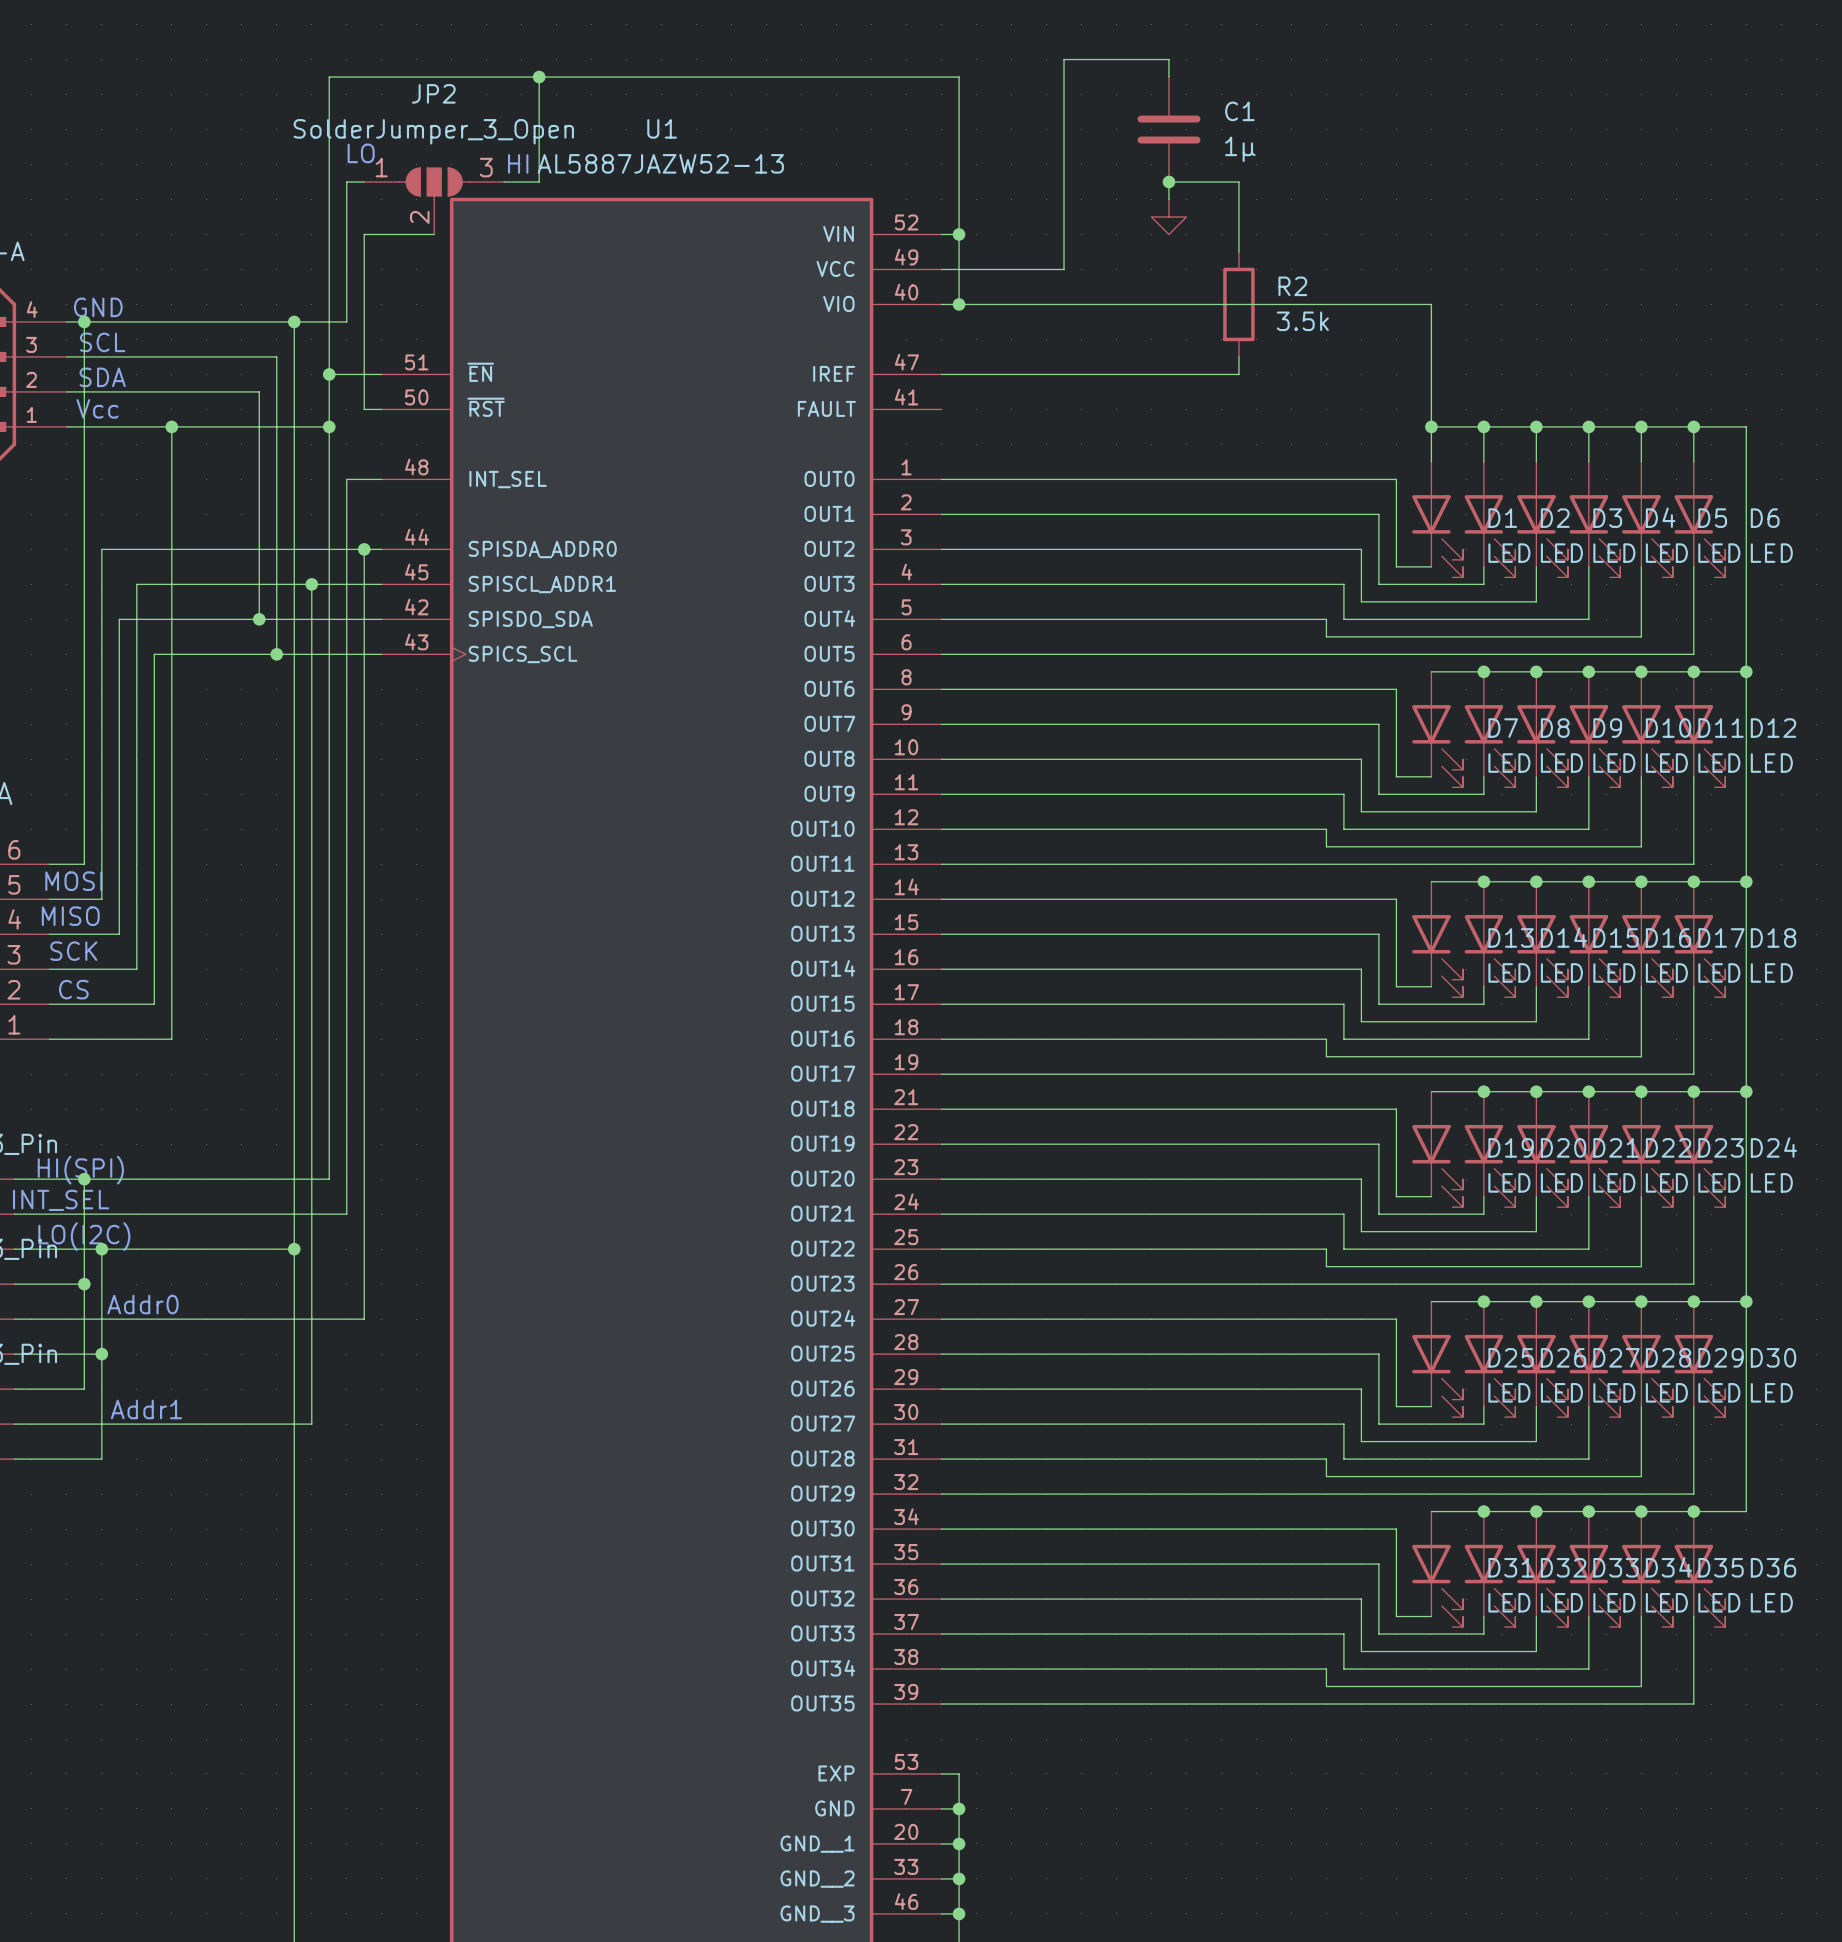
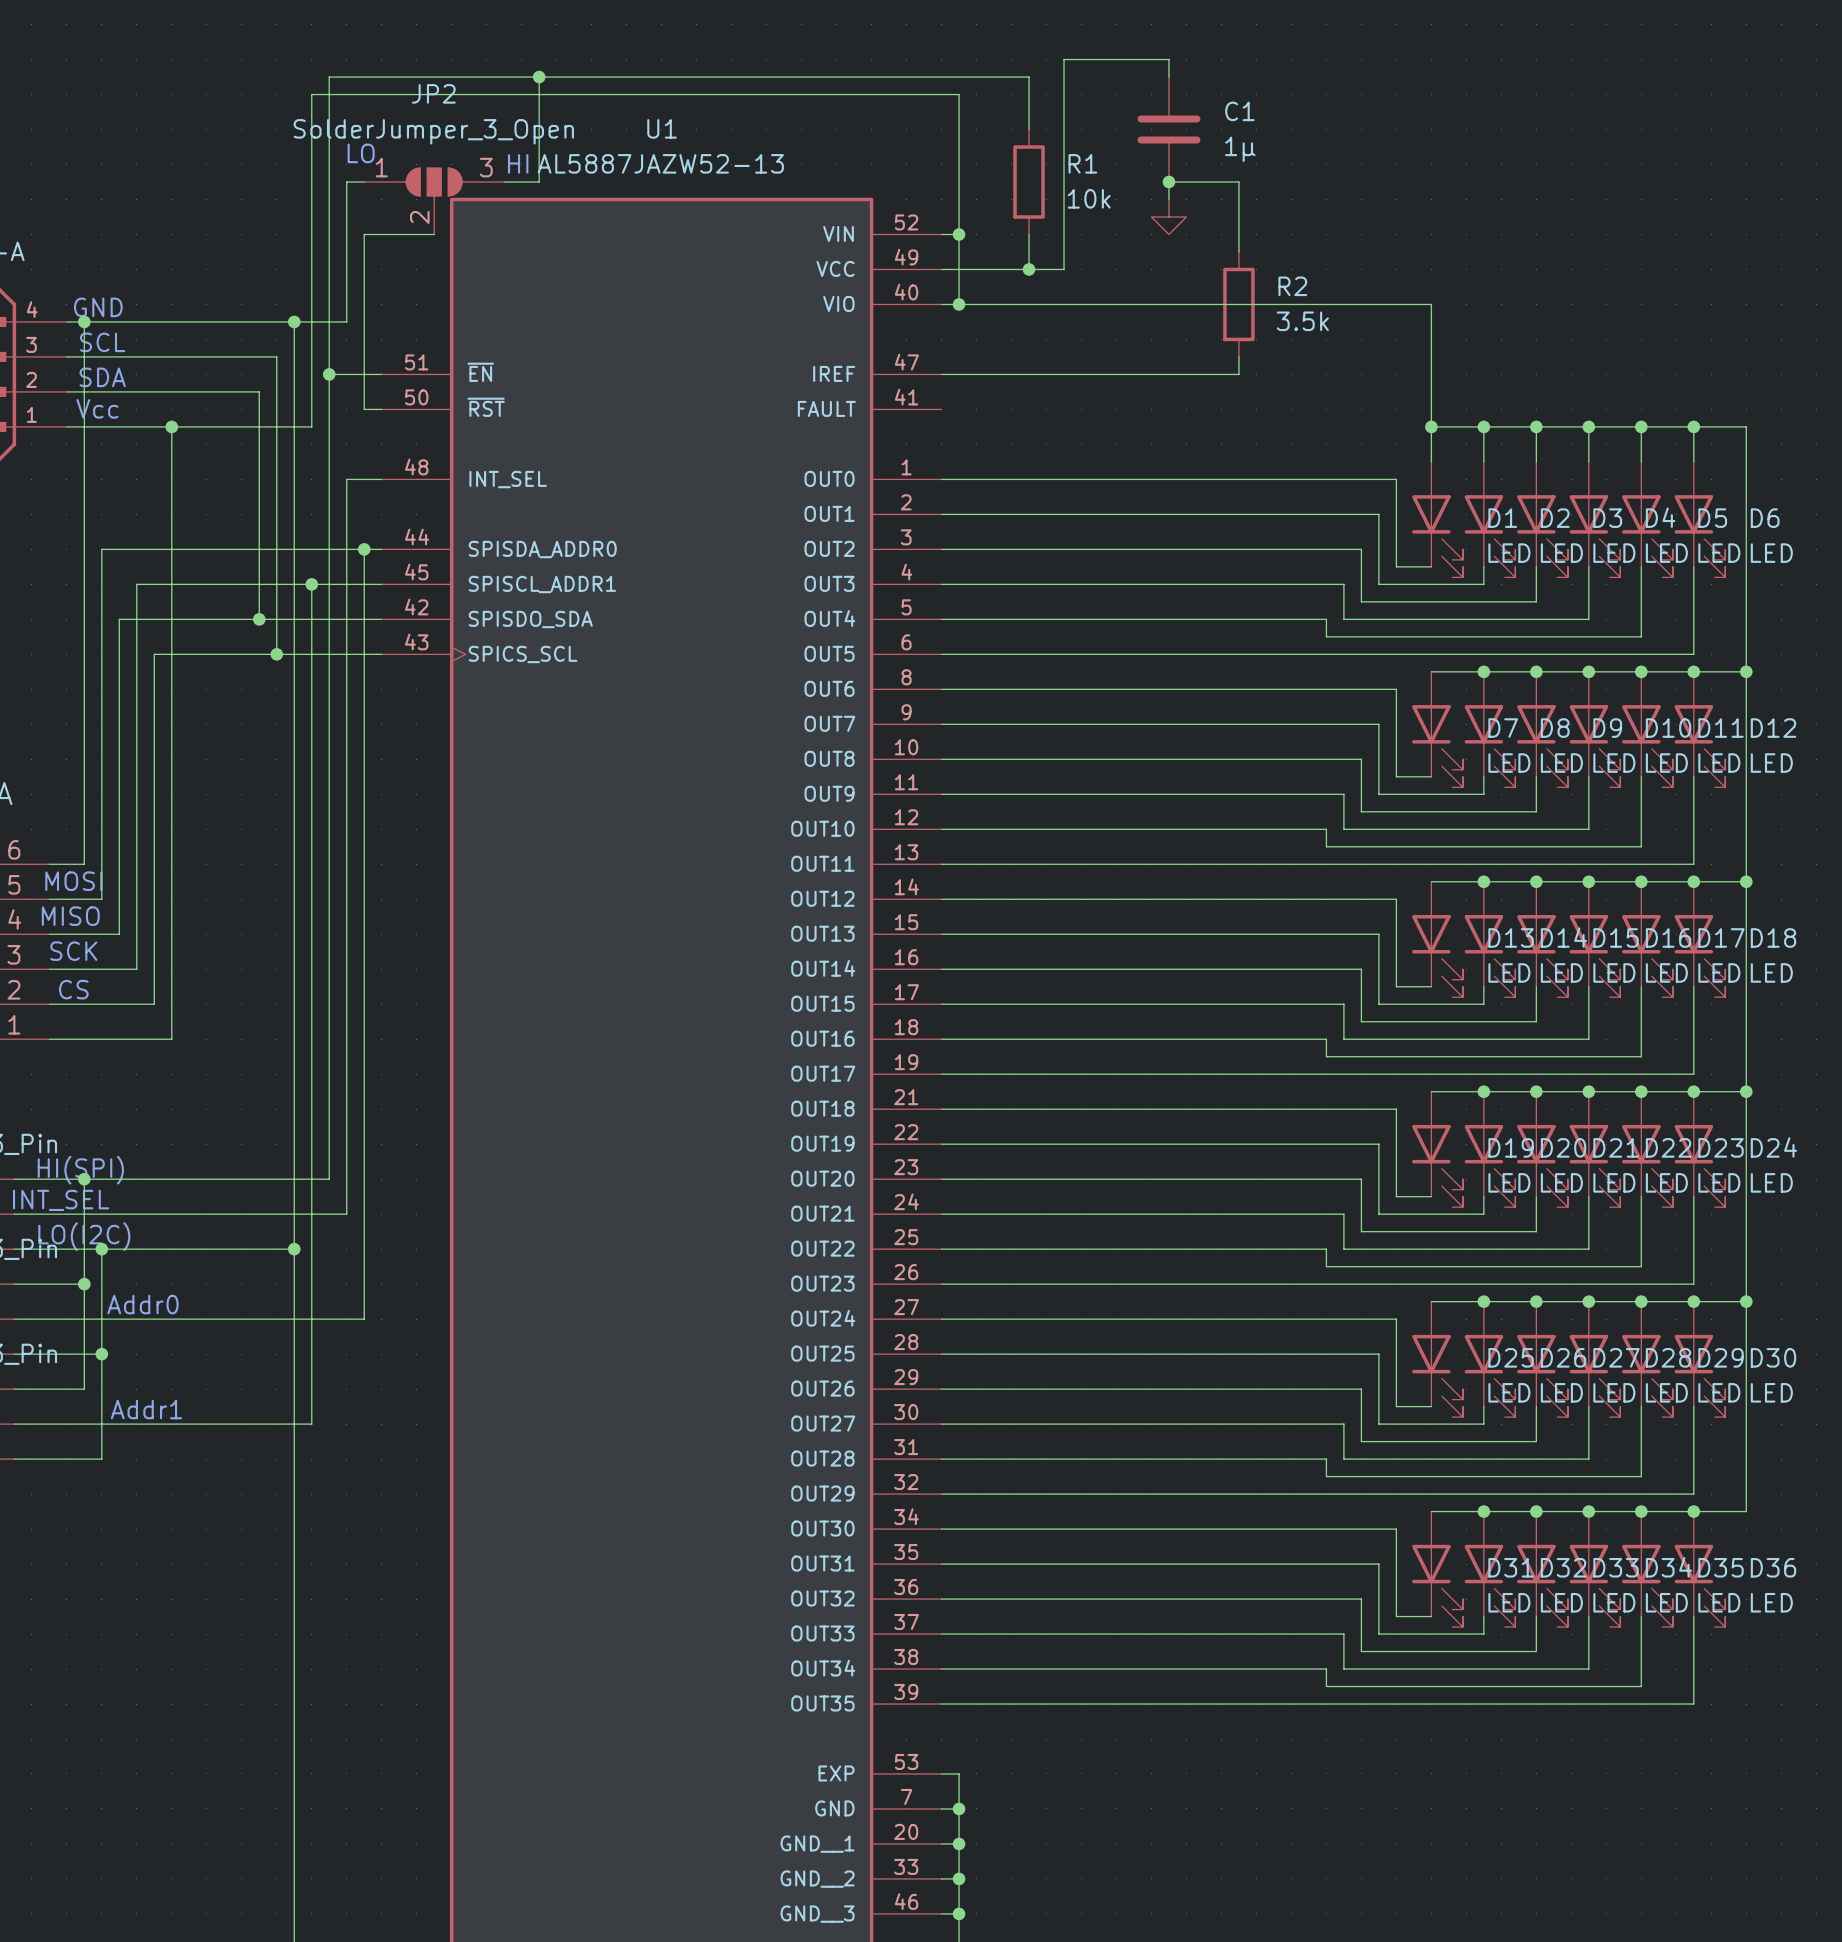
wire: (959, 77) (959, 94) -> (959, 77) (1029, 77) (1029, 129)
R1: none -> 10k (1029, 182)
wire: none -> (1029, 234) (1029, 269)
junction: none -> (1029, 269)
wire: (311, 426) (329, 426) -> (311, 426) (311, 94) (959, 94)
junction: (329, 426) -> none

